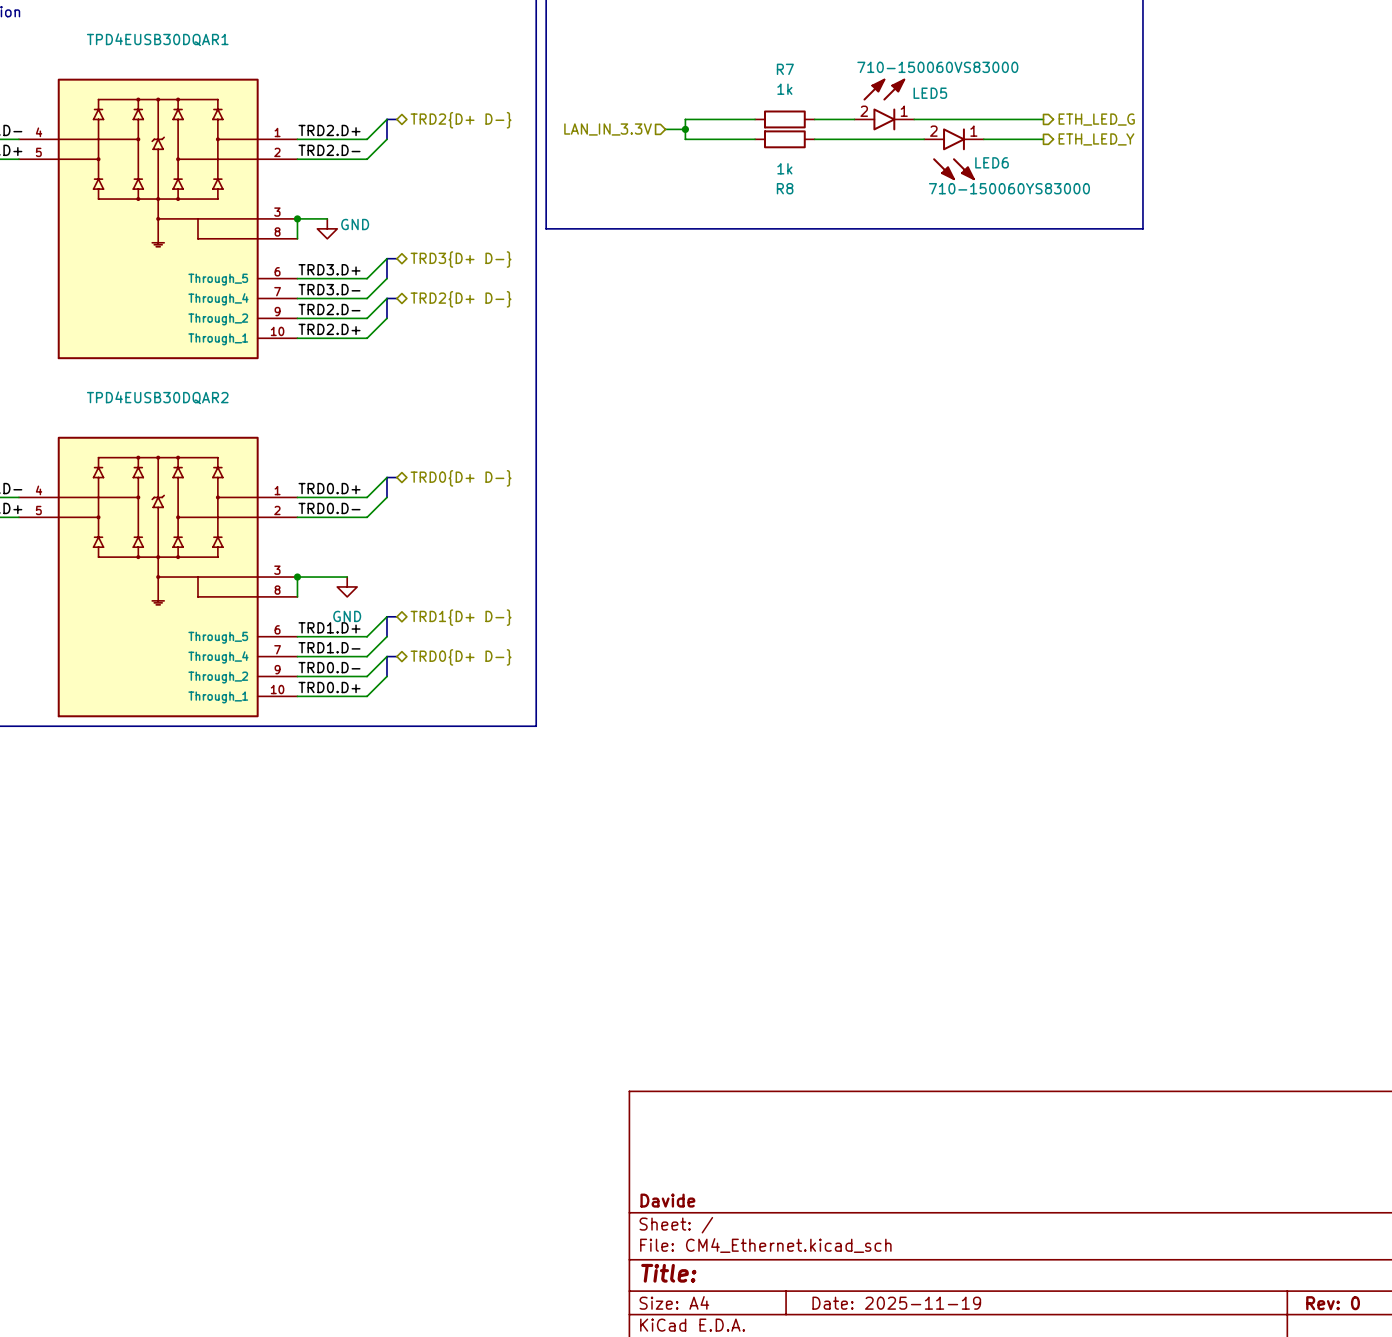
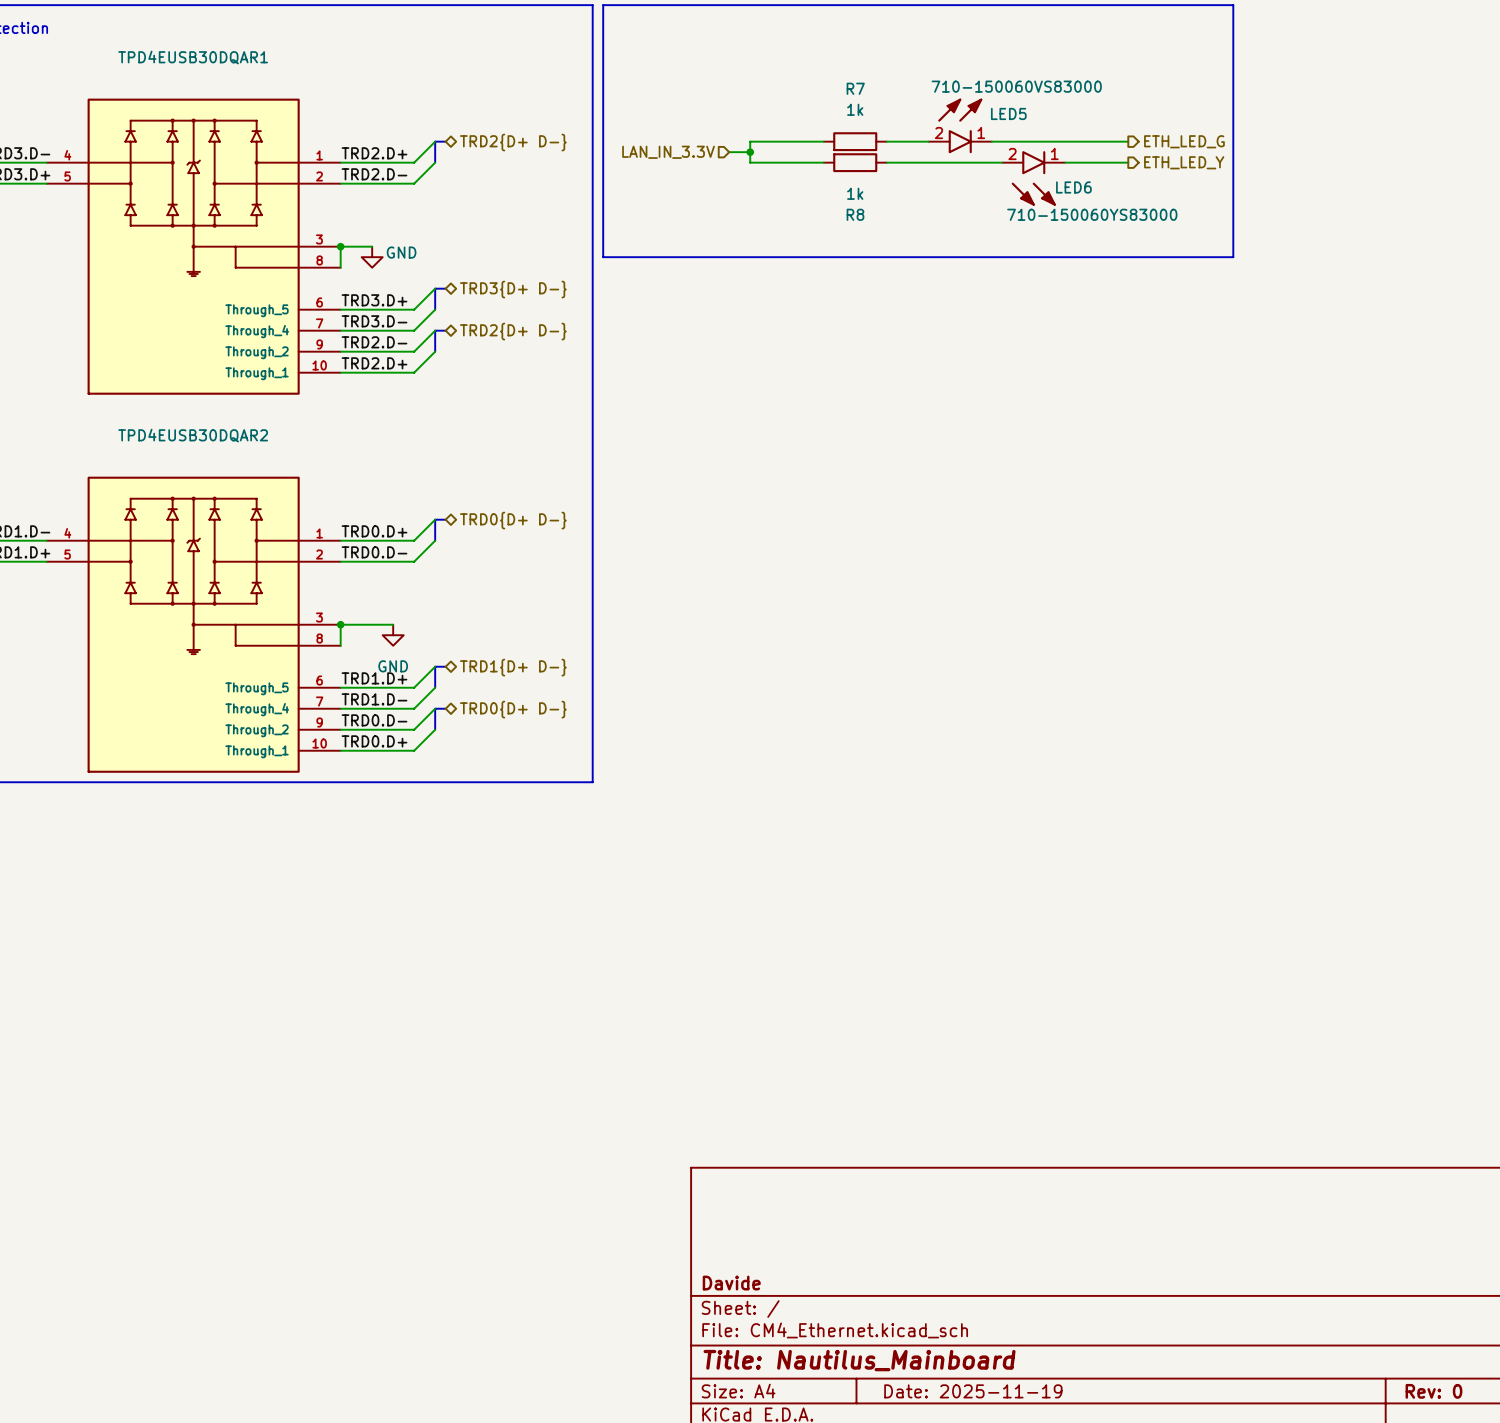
title block: Title: (668, 1273) -> Title: Nautilus_Mainboard (859, 1360)

